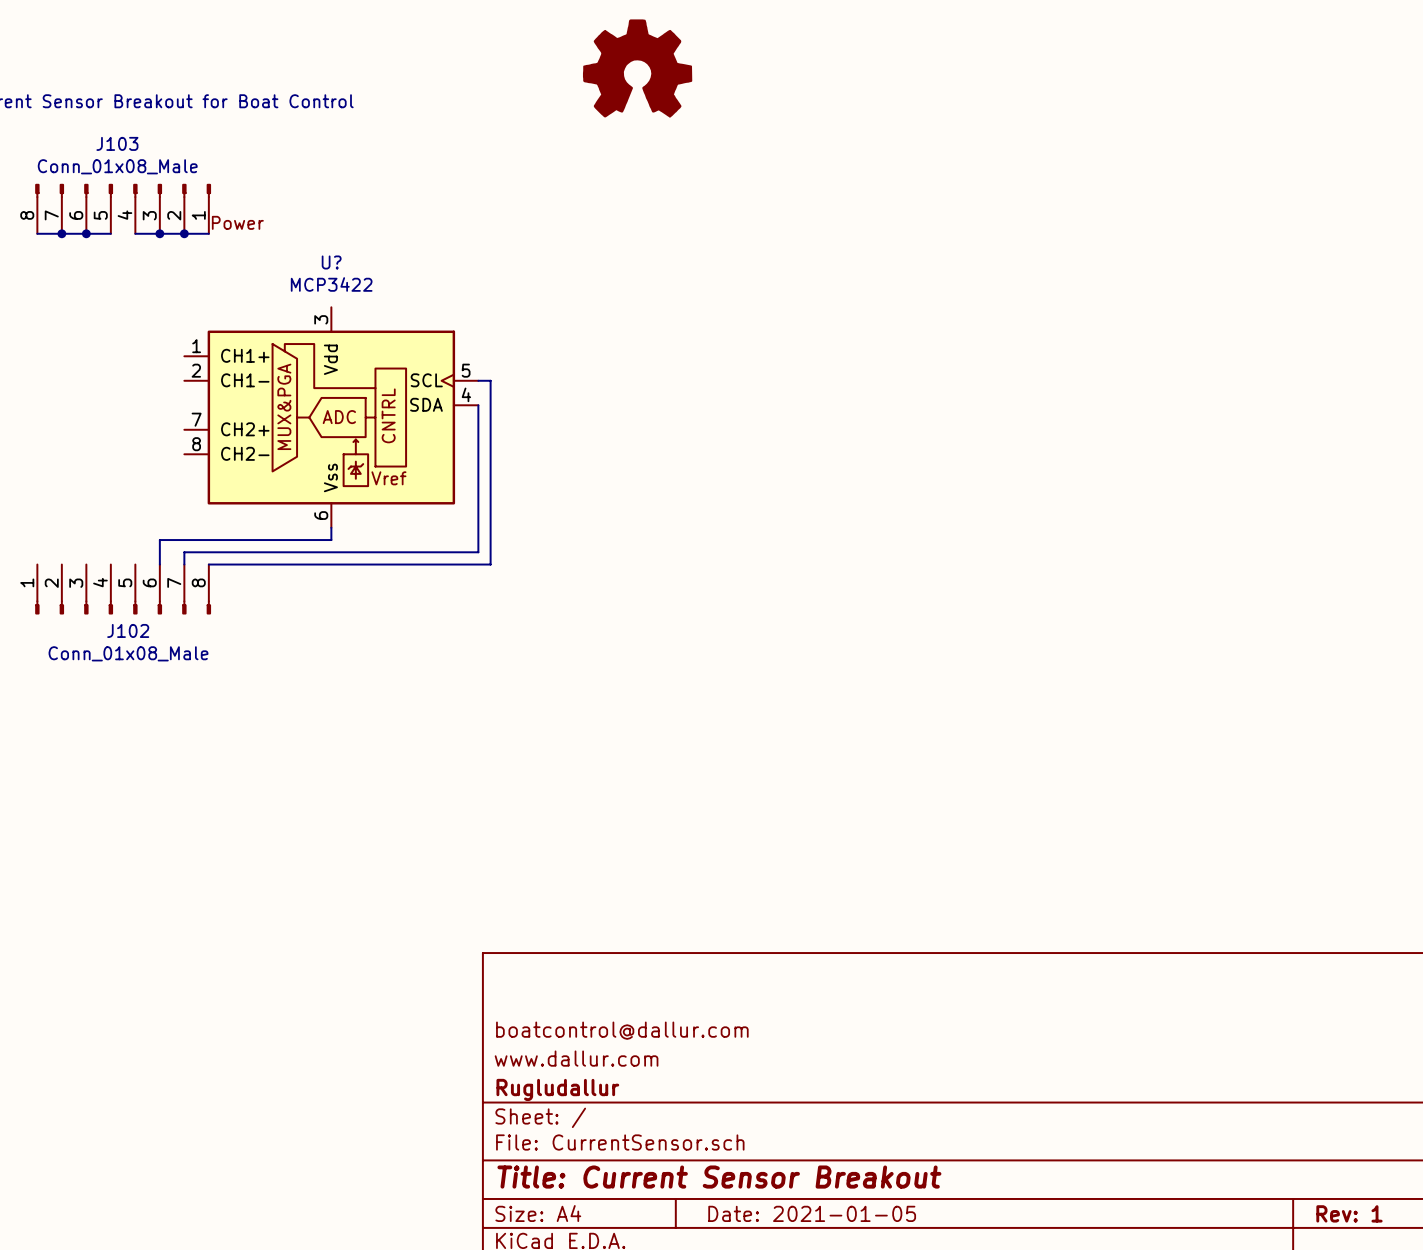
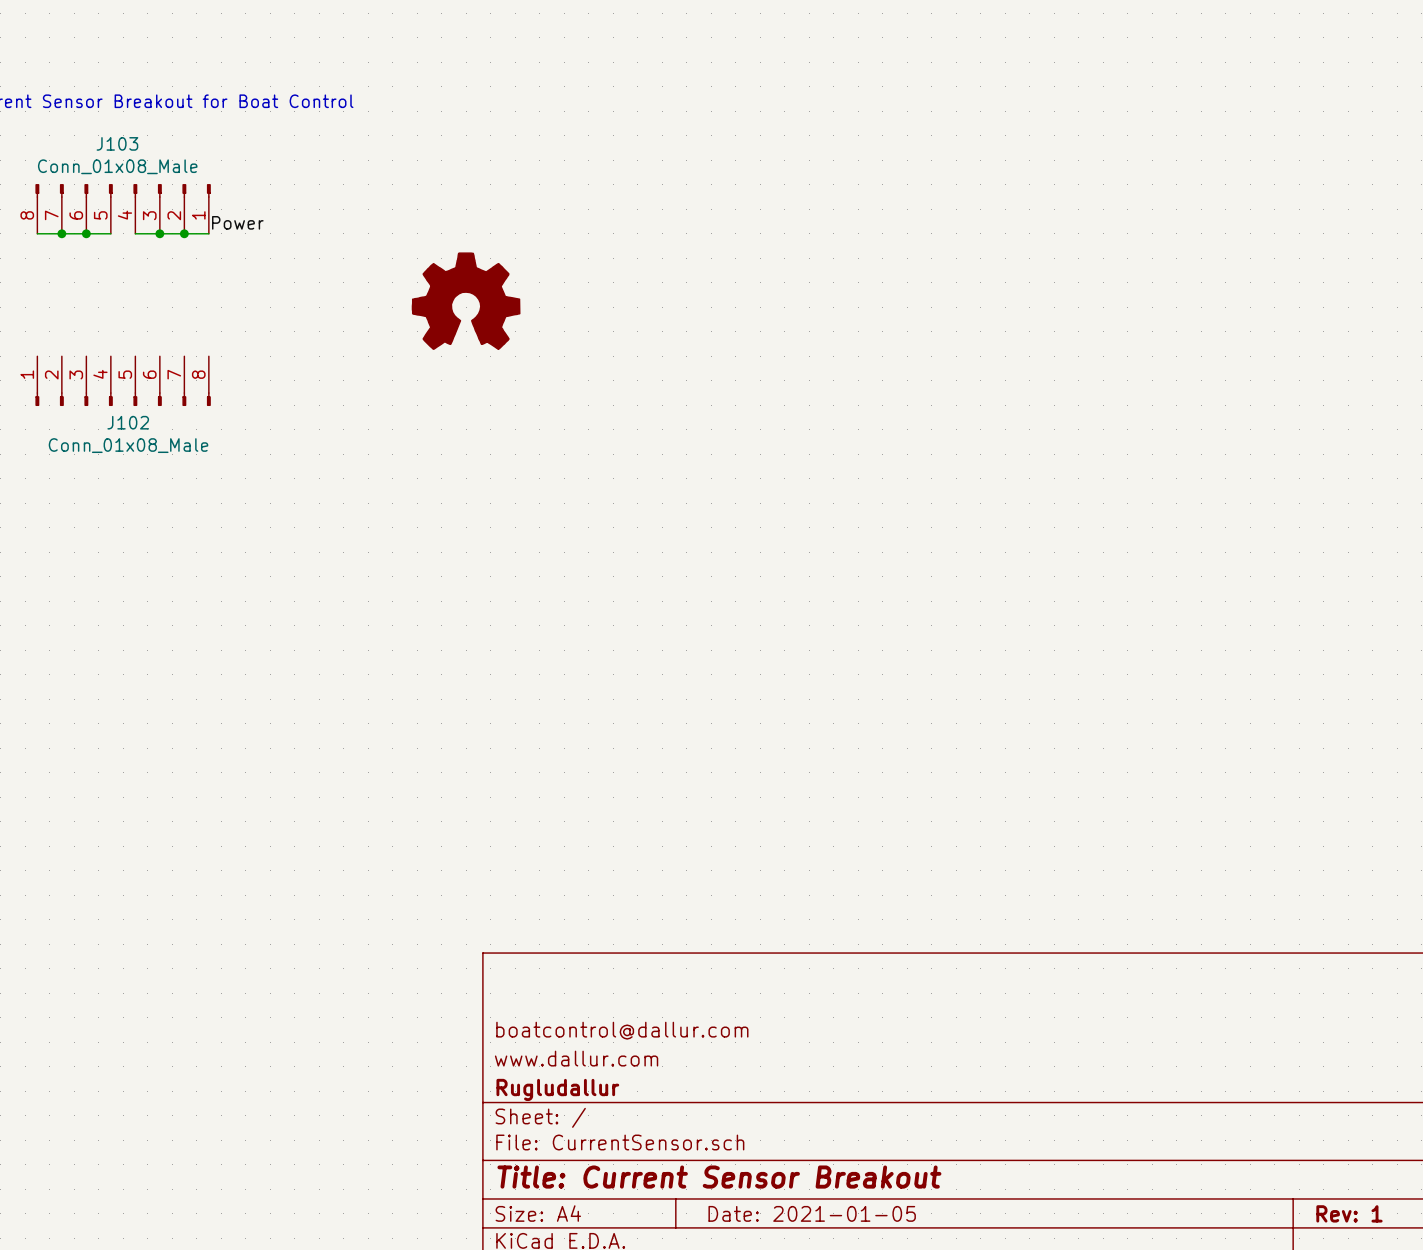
part: (637, 68) -> none
part: none -> (466, 301)
wire: (478, 380) (490, 380) (490, 564) (208, 564) -> none
wire: (478, 405) (478, 552) (184, 552) (184, 564) -> none
U?: MCP3422 (331, 417) -> none
wire: (331, 527) (331, 540) (159, 540) (159, 564) -> none
J102 position: (123, 589) -> (123, 381)

